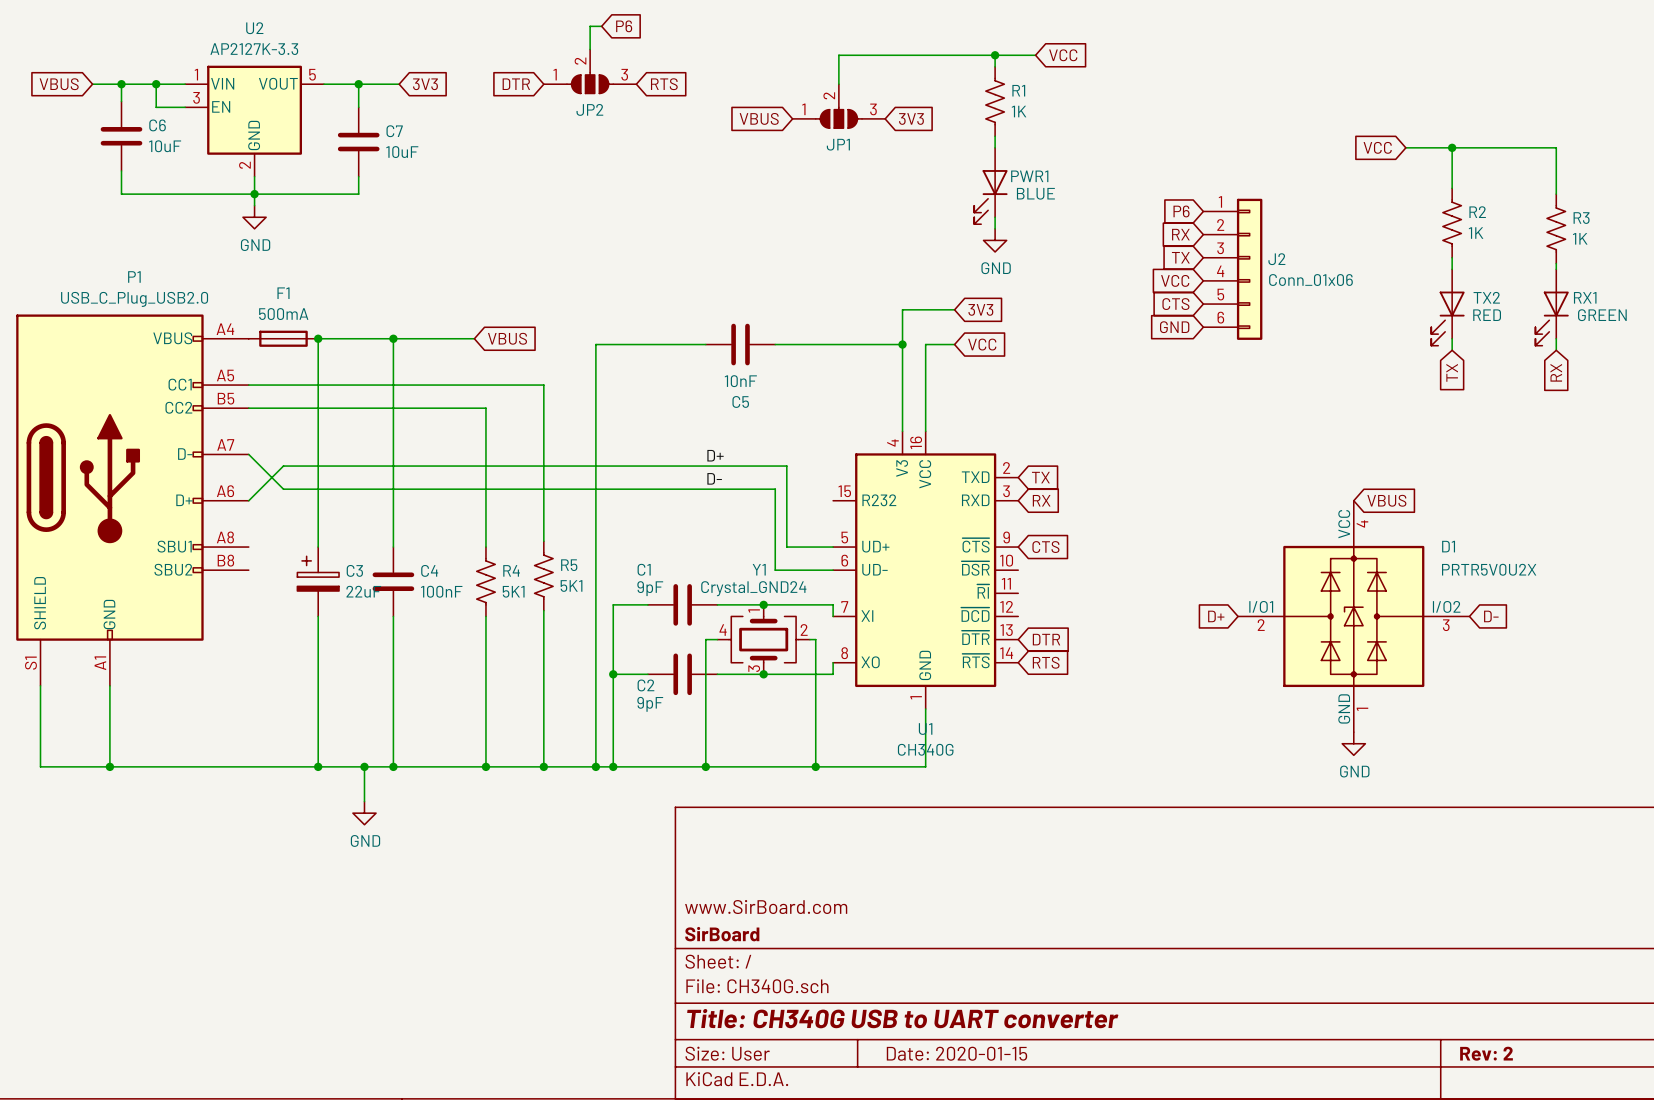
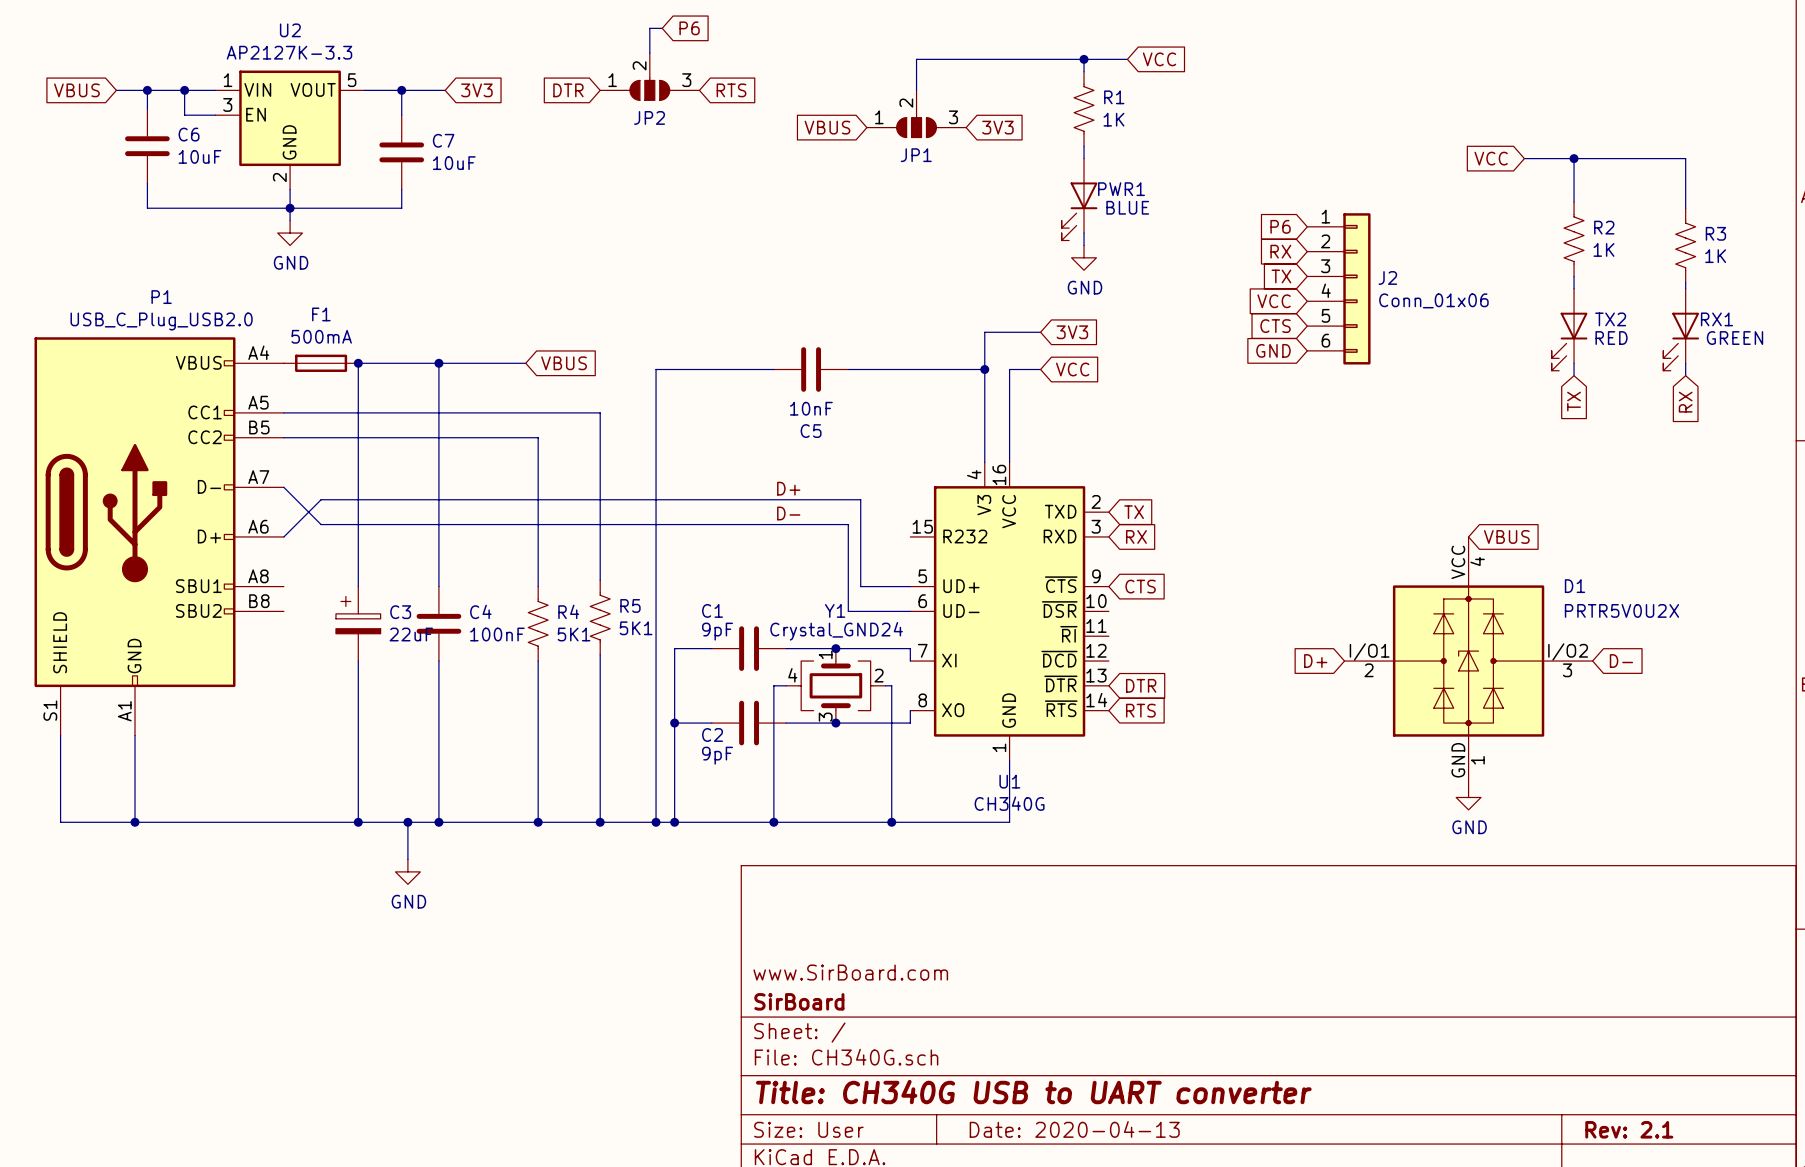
title block: Date: 2020-01-15 (956, 1053) -> Date: 2020-04-13 (1074, 1129)
title block: Rev: 2 (1486, 1053) -> Rev: 2.1 (1629, 1129)

